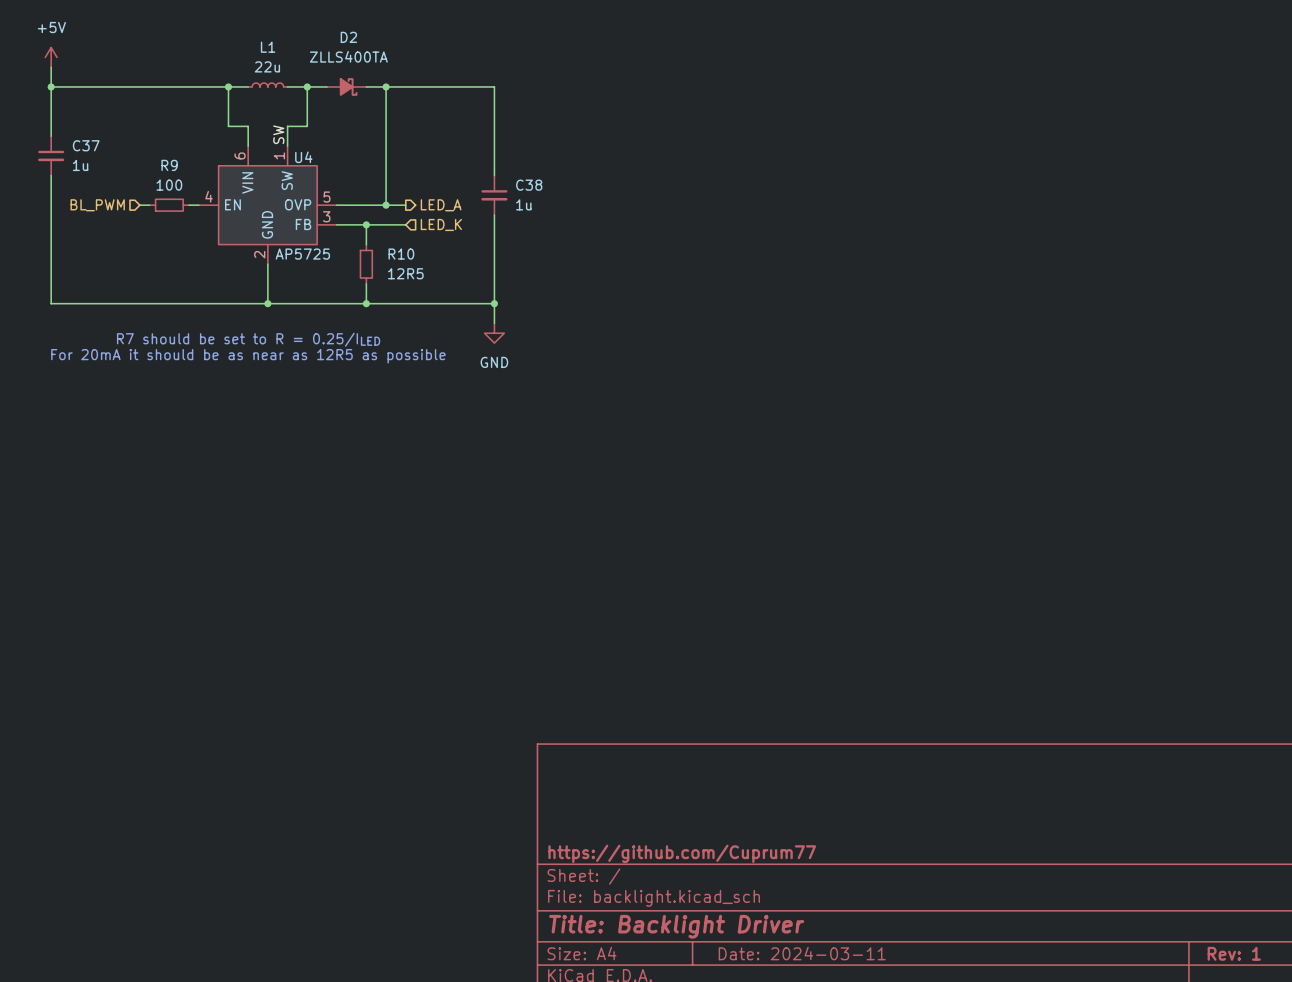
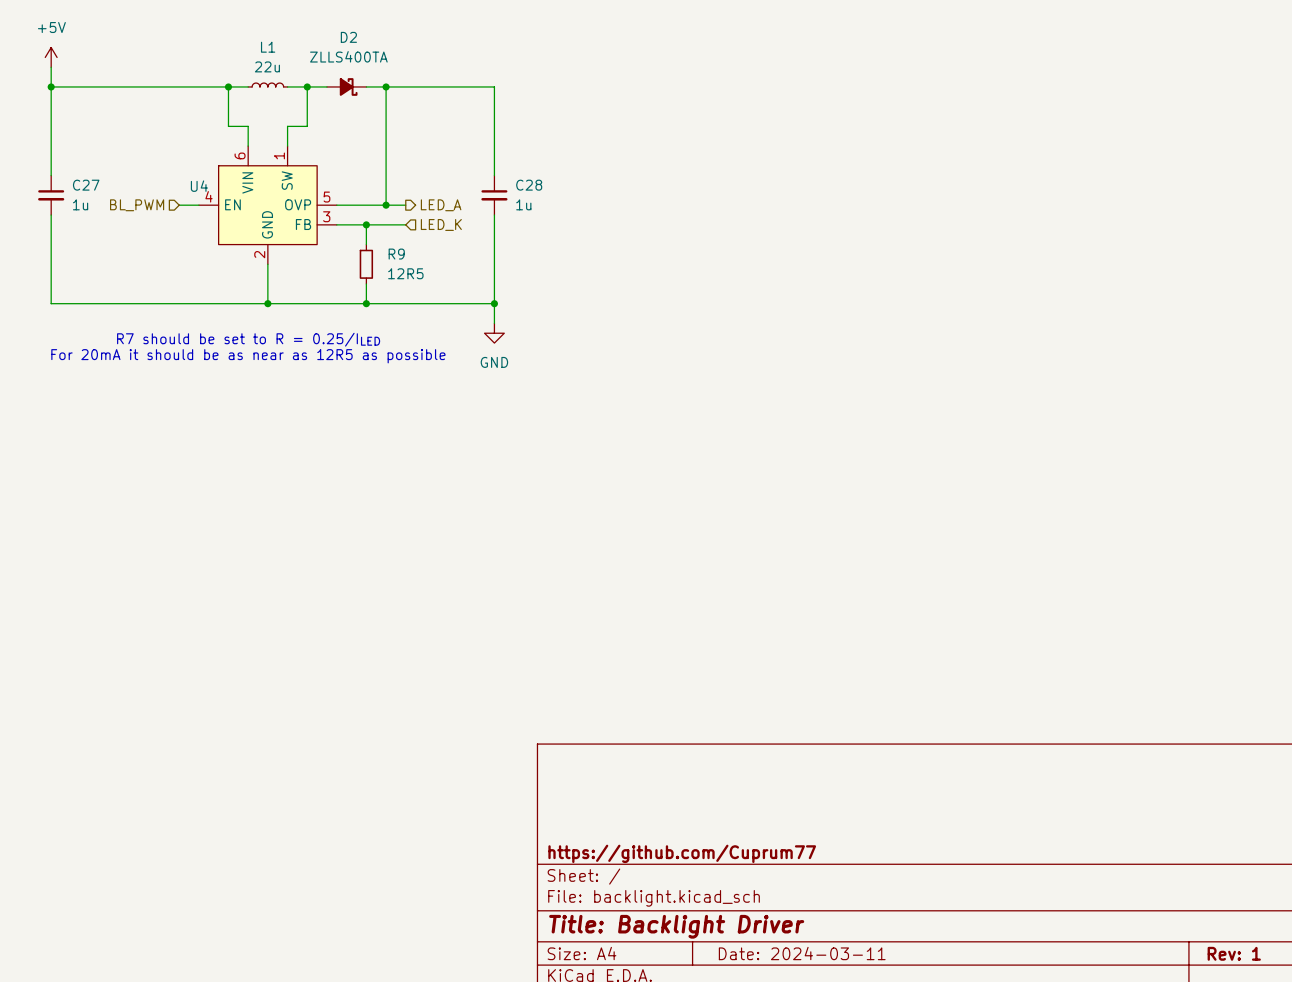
label: SW (278, 134) -> none
C37: 1u (51, 155) -> none
U4 name position: U4 (303, 157) -> U4 (199, 186)
C38 name: C38 (529, 185) -> C28 (529, 185)
C27: none -> 1u (51, 195)
hierarchical label position: BL_PWM (97, 205) -> BL_PWM (137, 205)
R9: 100 (169, 205) -> none
U4 value: AP5725 (302, 254) -> none
R10 name: R10 (401, 254) -> R9 (396, 254)

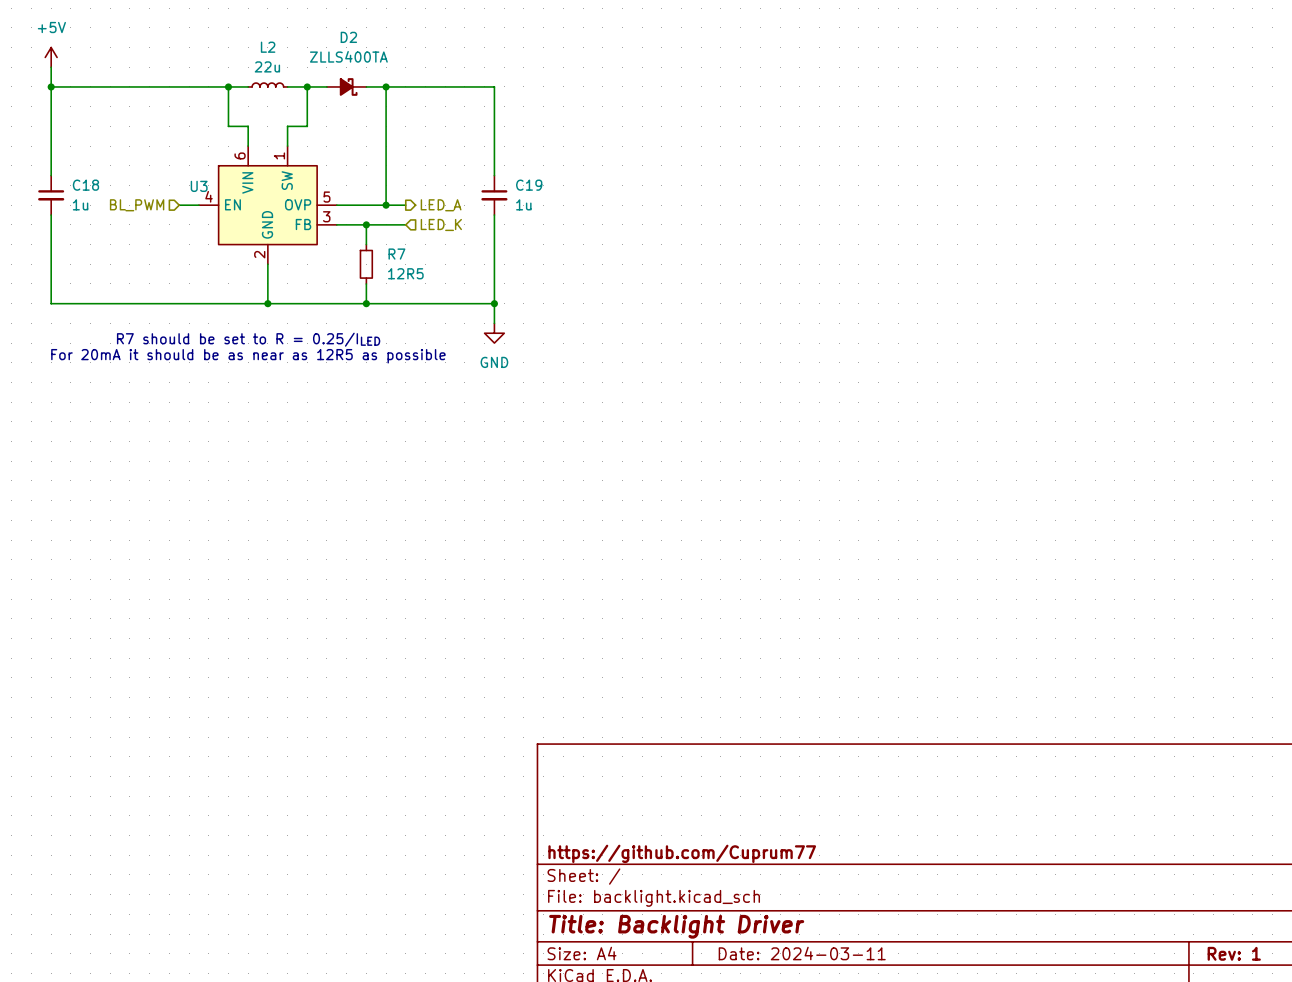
L1 name: L1 (268, 47) -> L2 (268, 47)
C27 name: C27 (86, 185) -> C18 (85, 185)
C28 name: C28 (529, 185) -> C19 (529, 185)
U4 name: U4 (199, 186) -> U3 (199, 186)
R9 name: R9 (396, 254) -> R7 (396, 254)

